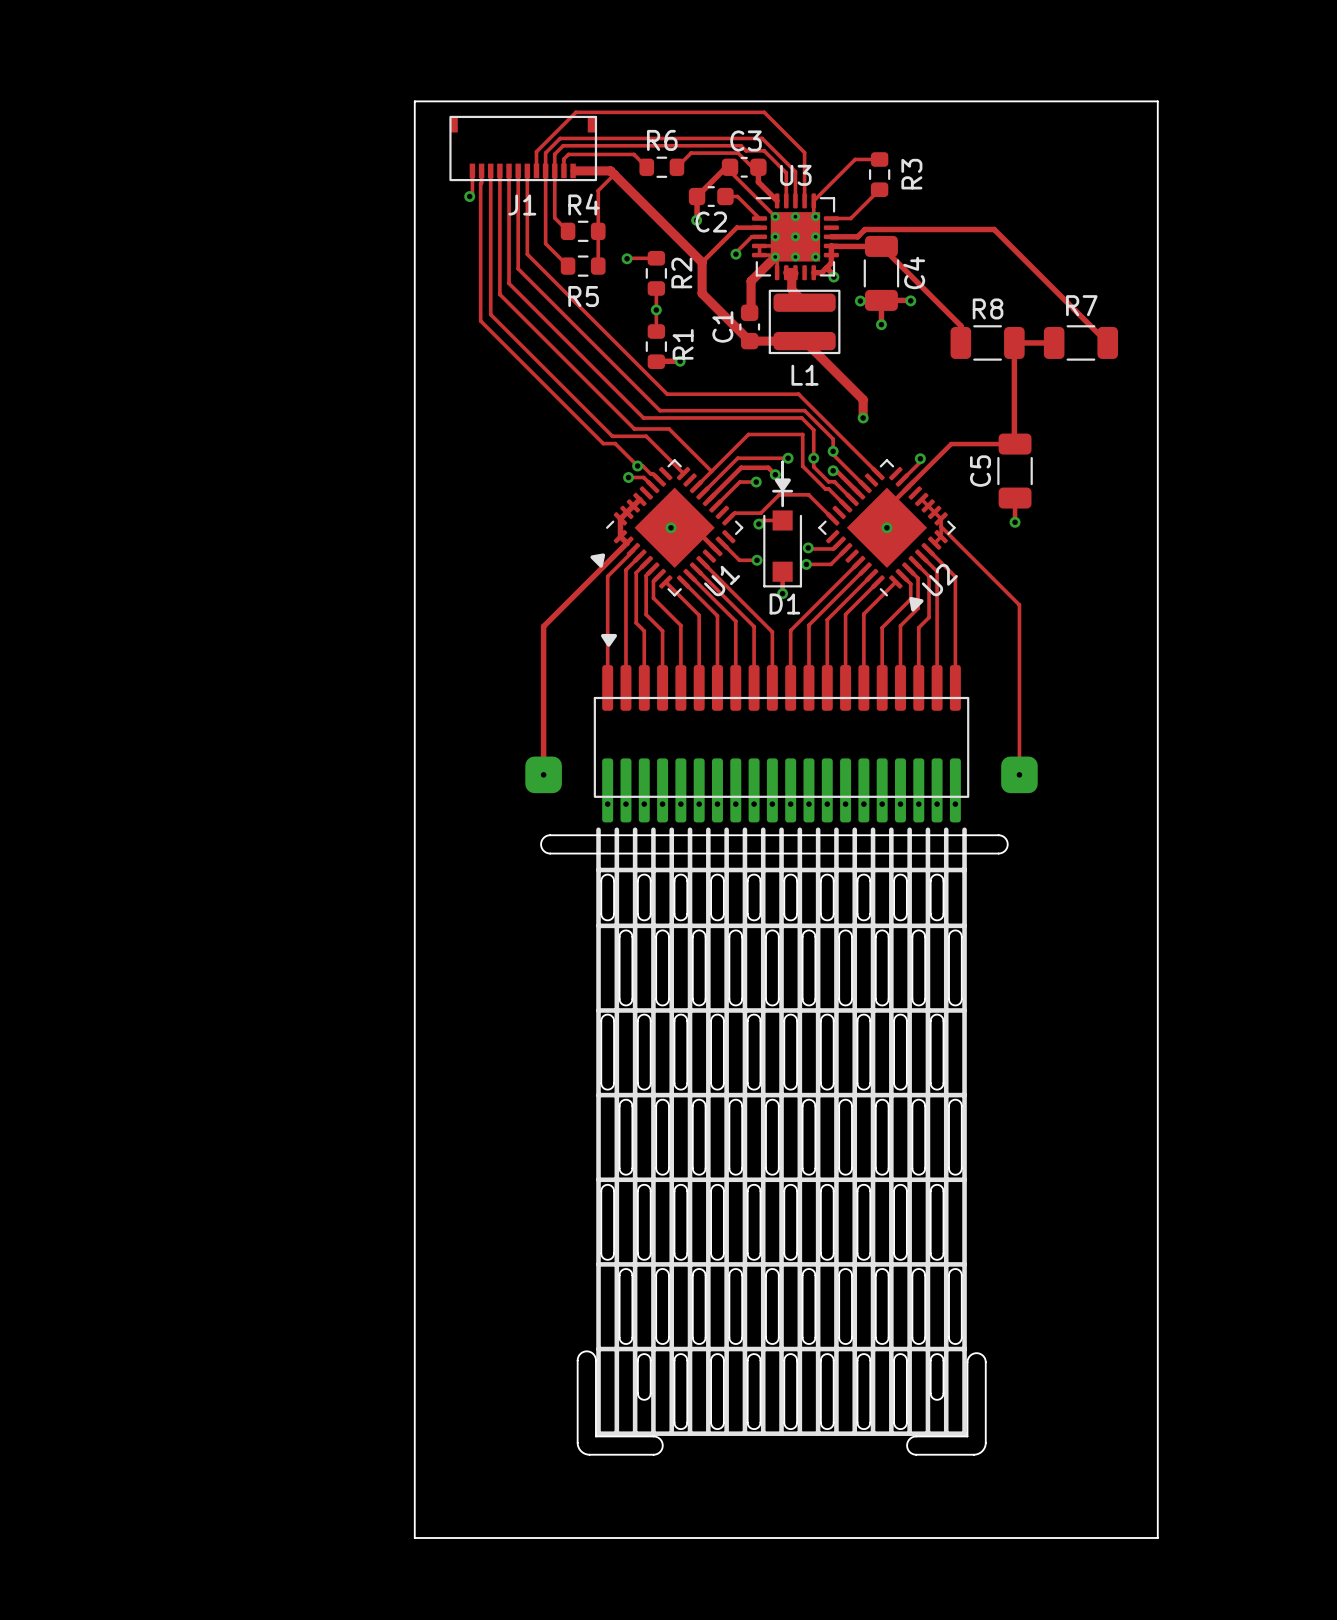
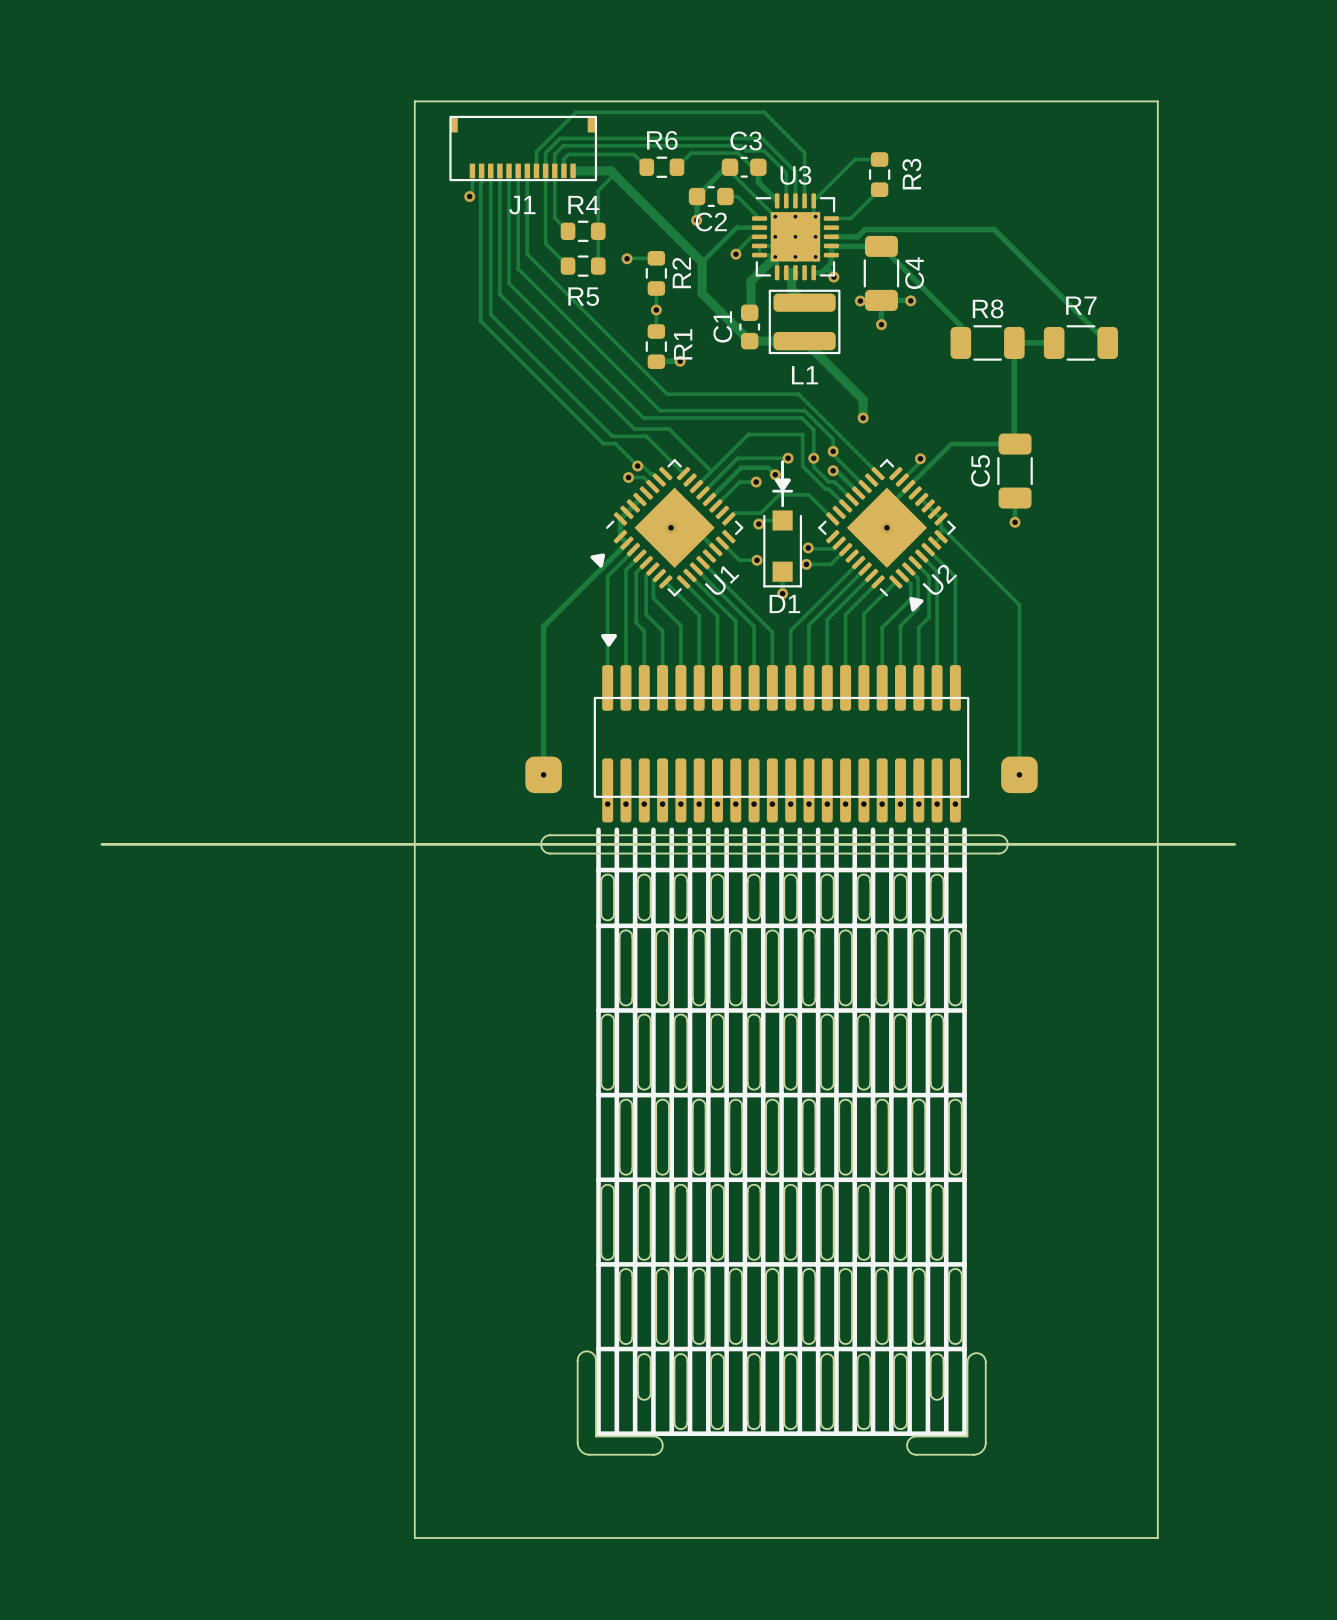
board edge: none -> (101, 844) (1234, 844)

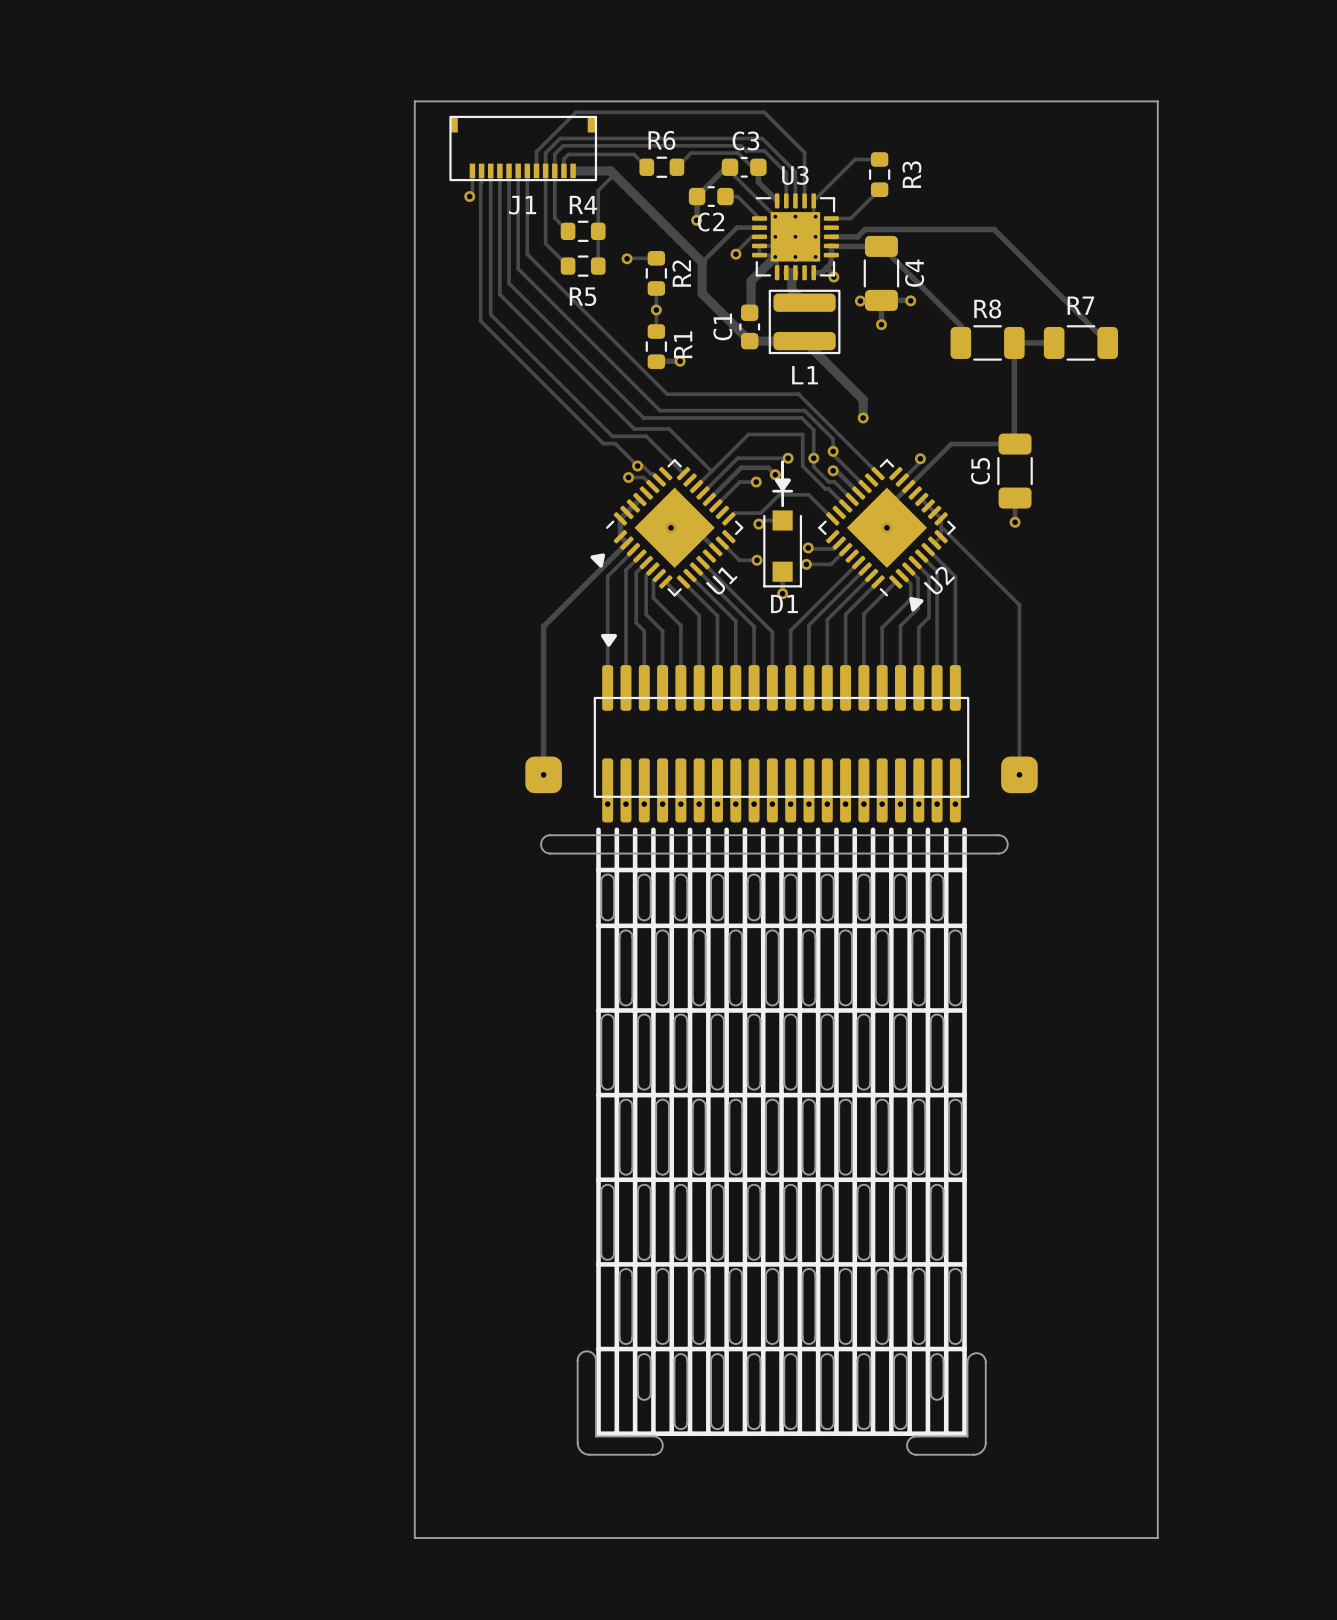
board edge: (101, 844) (1234, 844) -> none

